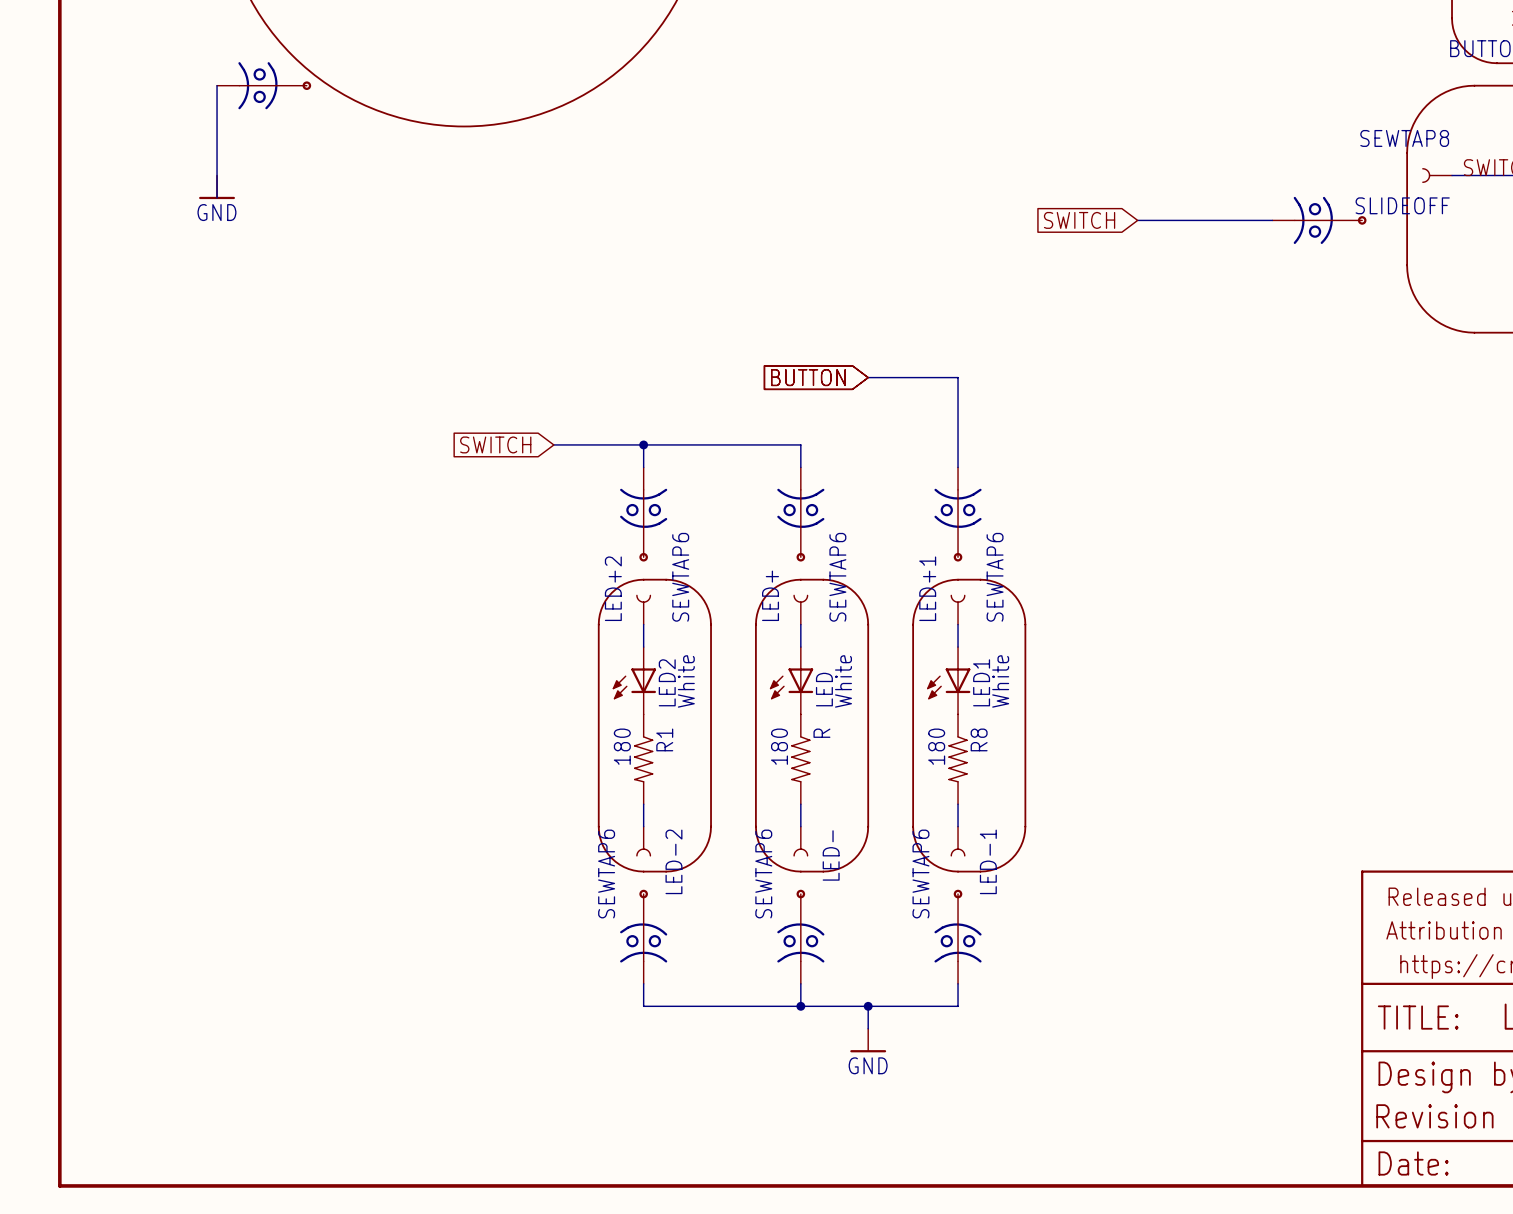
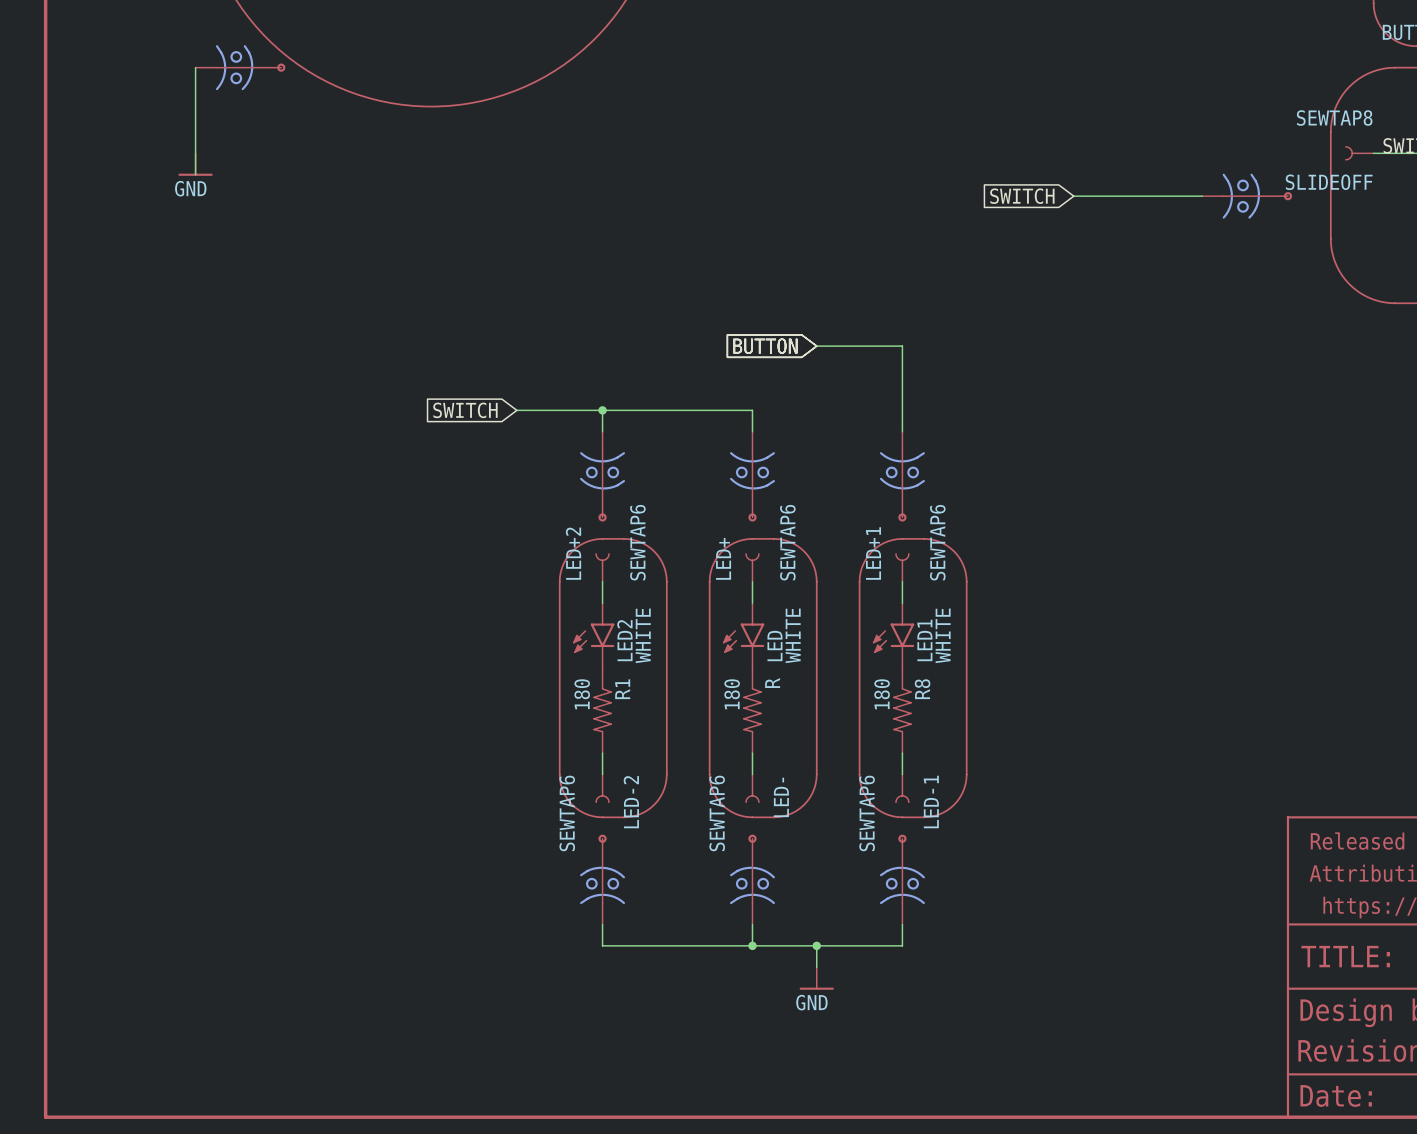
LED2 symbol: [612, 647, 657, 715] -> [572, 603, 615, 668]
LED symbol: [769, 647, 814, 715] -> [722, 603, 765, 668]
LED1 symbol: [927, 647, 971, 715] -> [872, 603, 915, 668]
LED2 value: White (686, 681) -> WHITE (643, 635)
LED value: White (843, 681) -> WHITE (793, 635)
LED1 value: White (1000, 681) -> WHITE (943, 635)

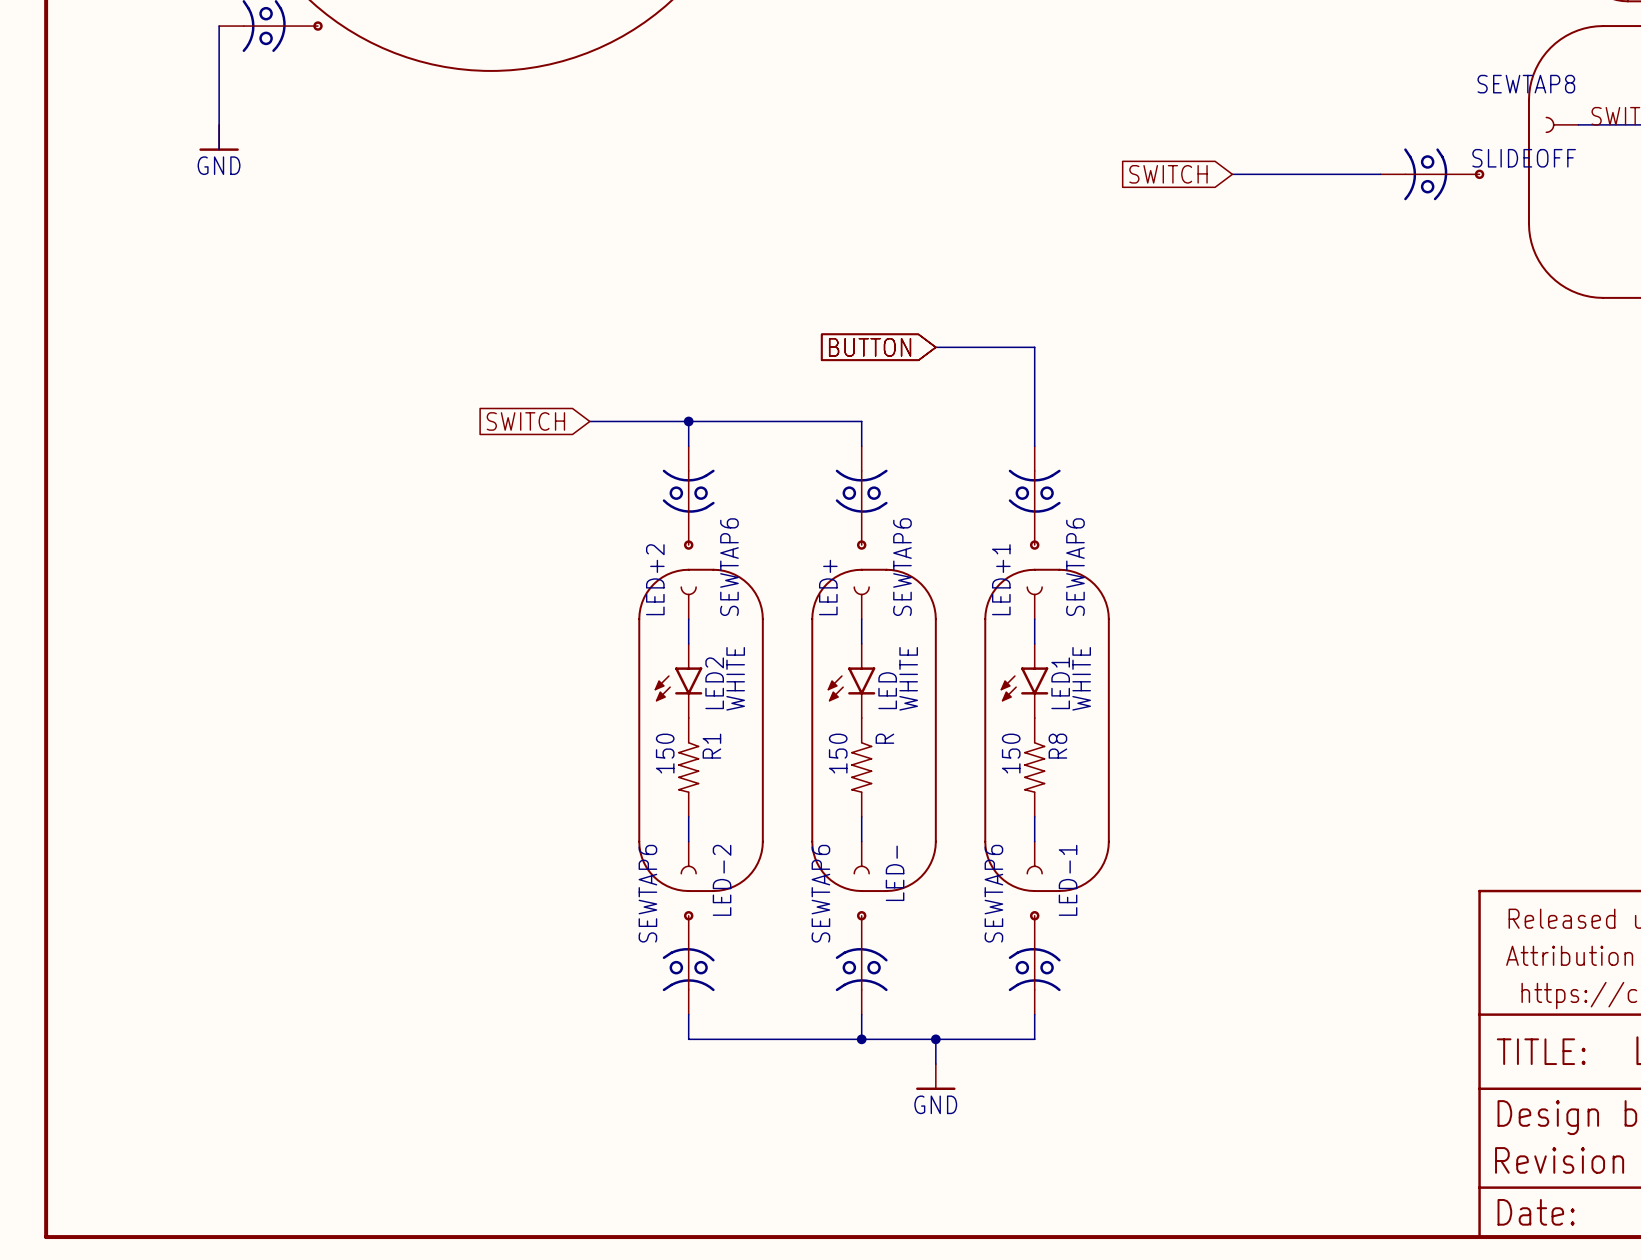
R1 value: 180 (582, 694) -> 150 (665, 753)
R value: 180 (732, 694) -> 150 (838, 753)
R8 value: 180 (882, 694) -> 150 (1011, 753)

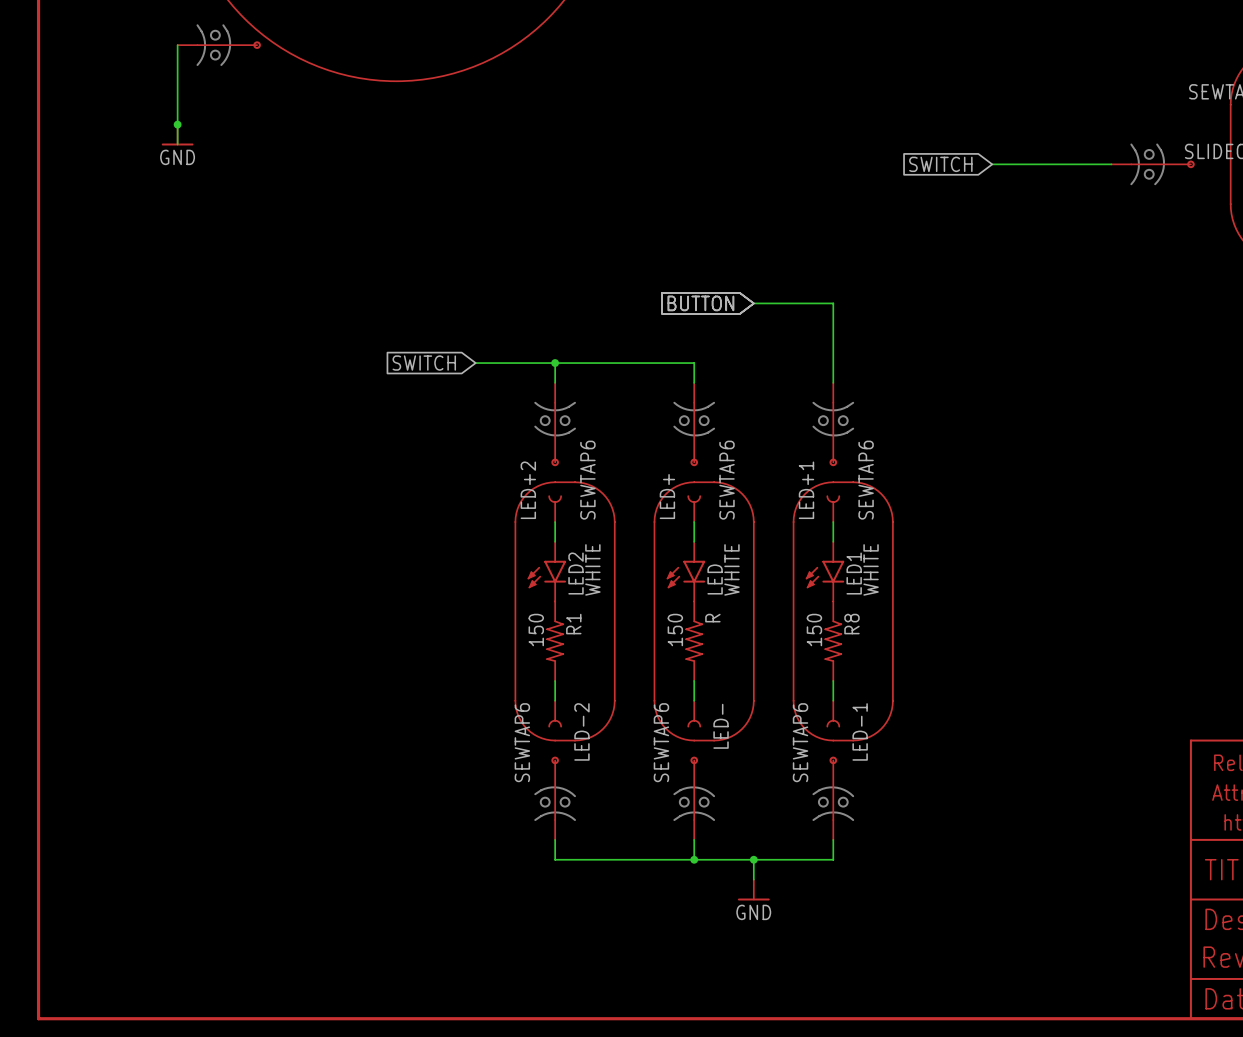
junction: none -> (177, 124)

